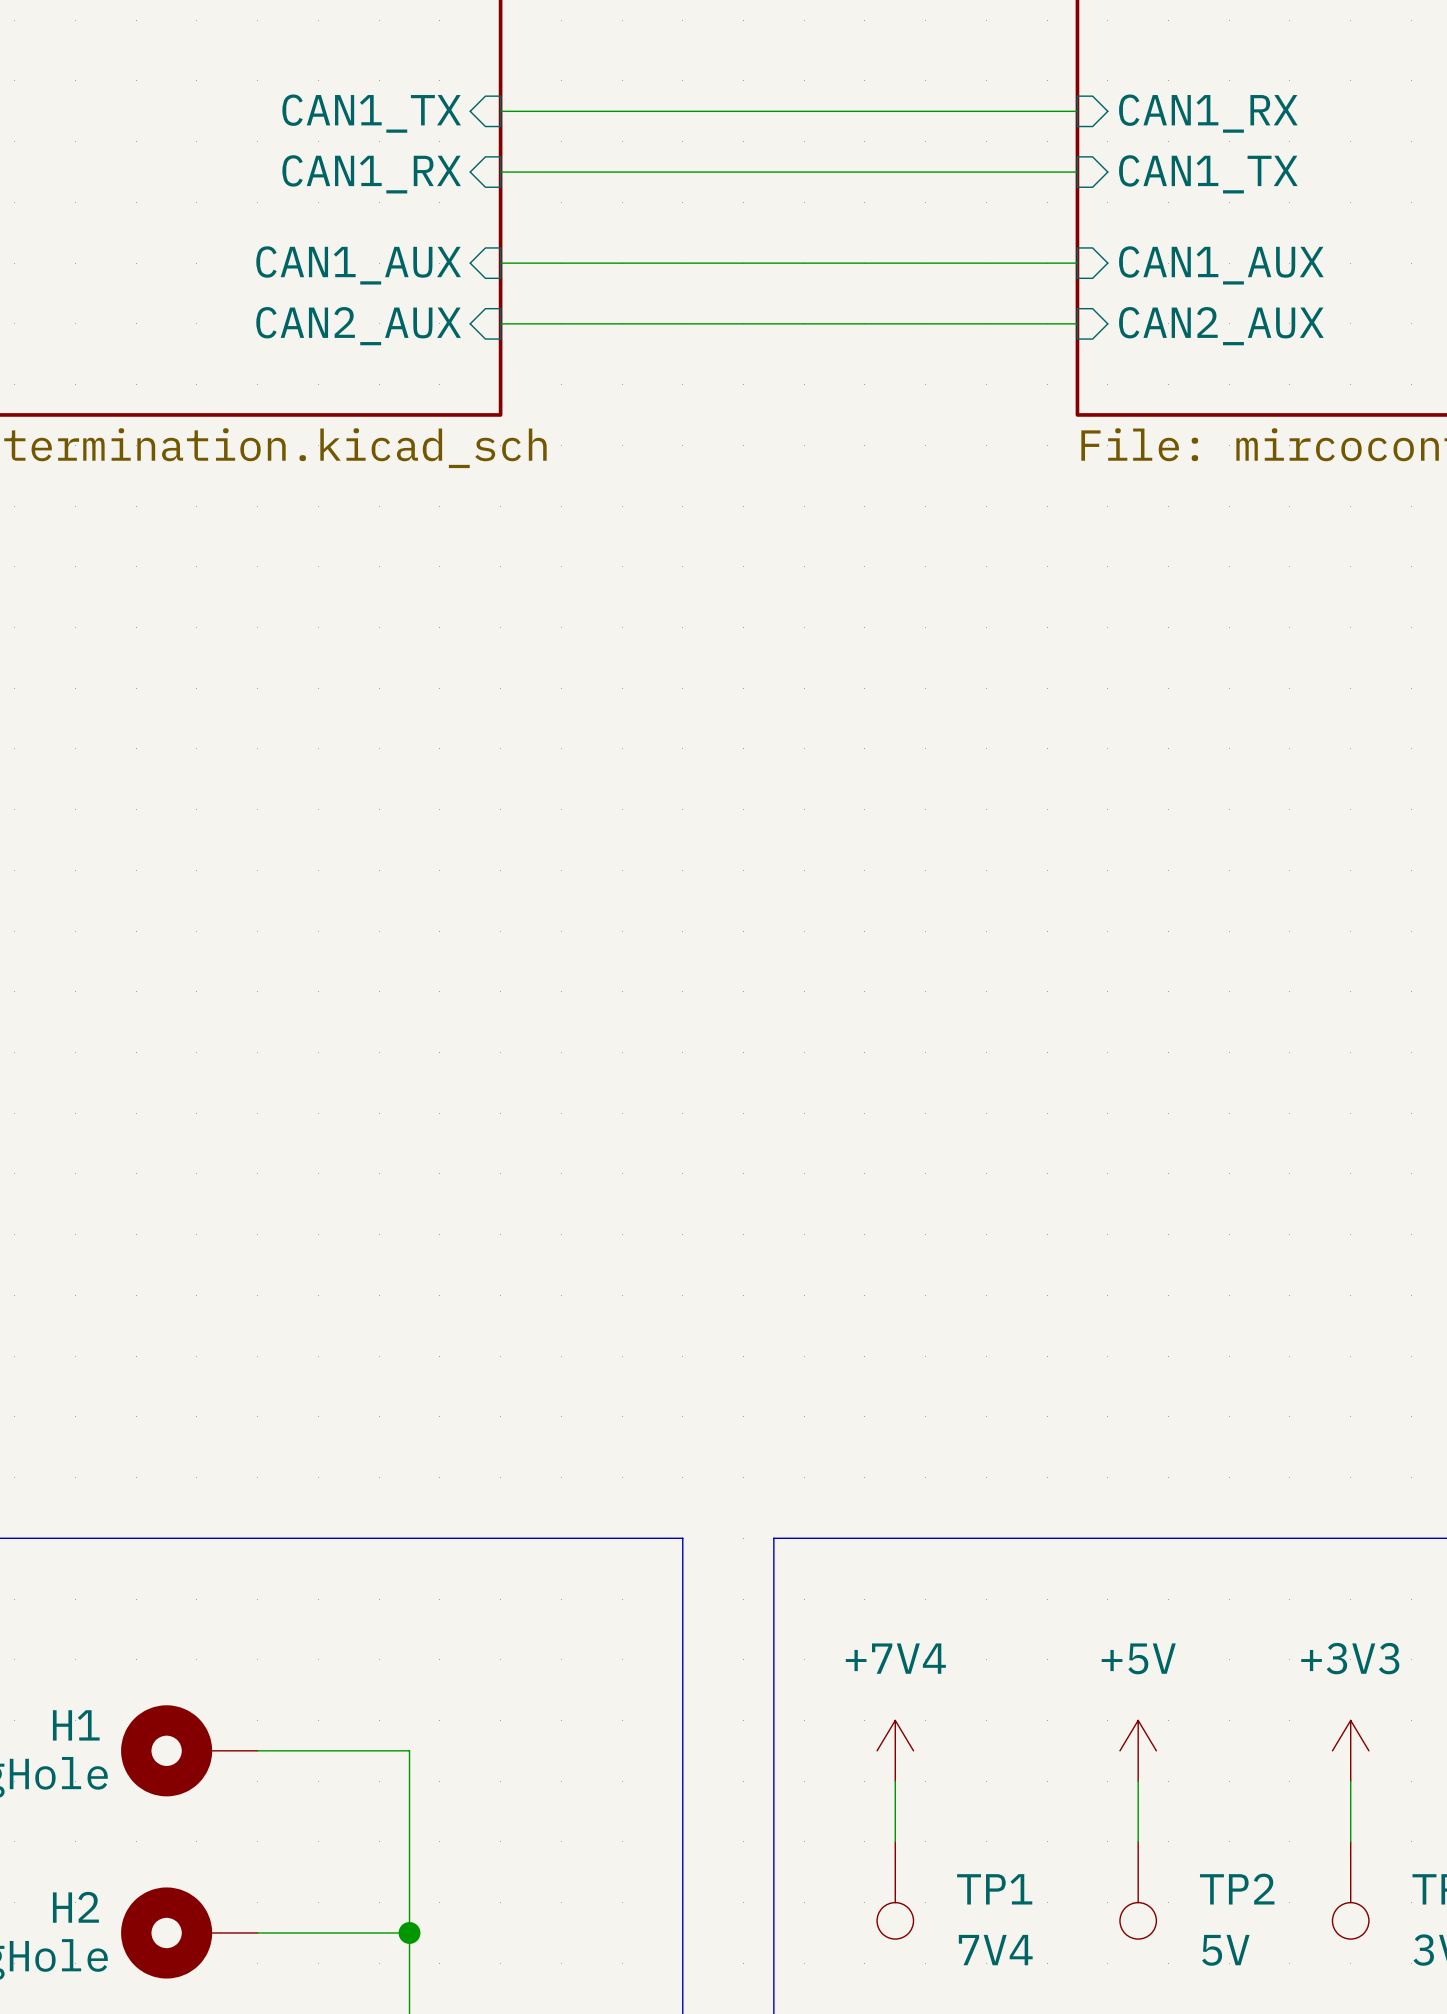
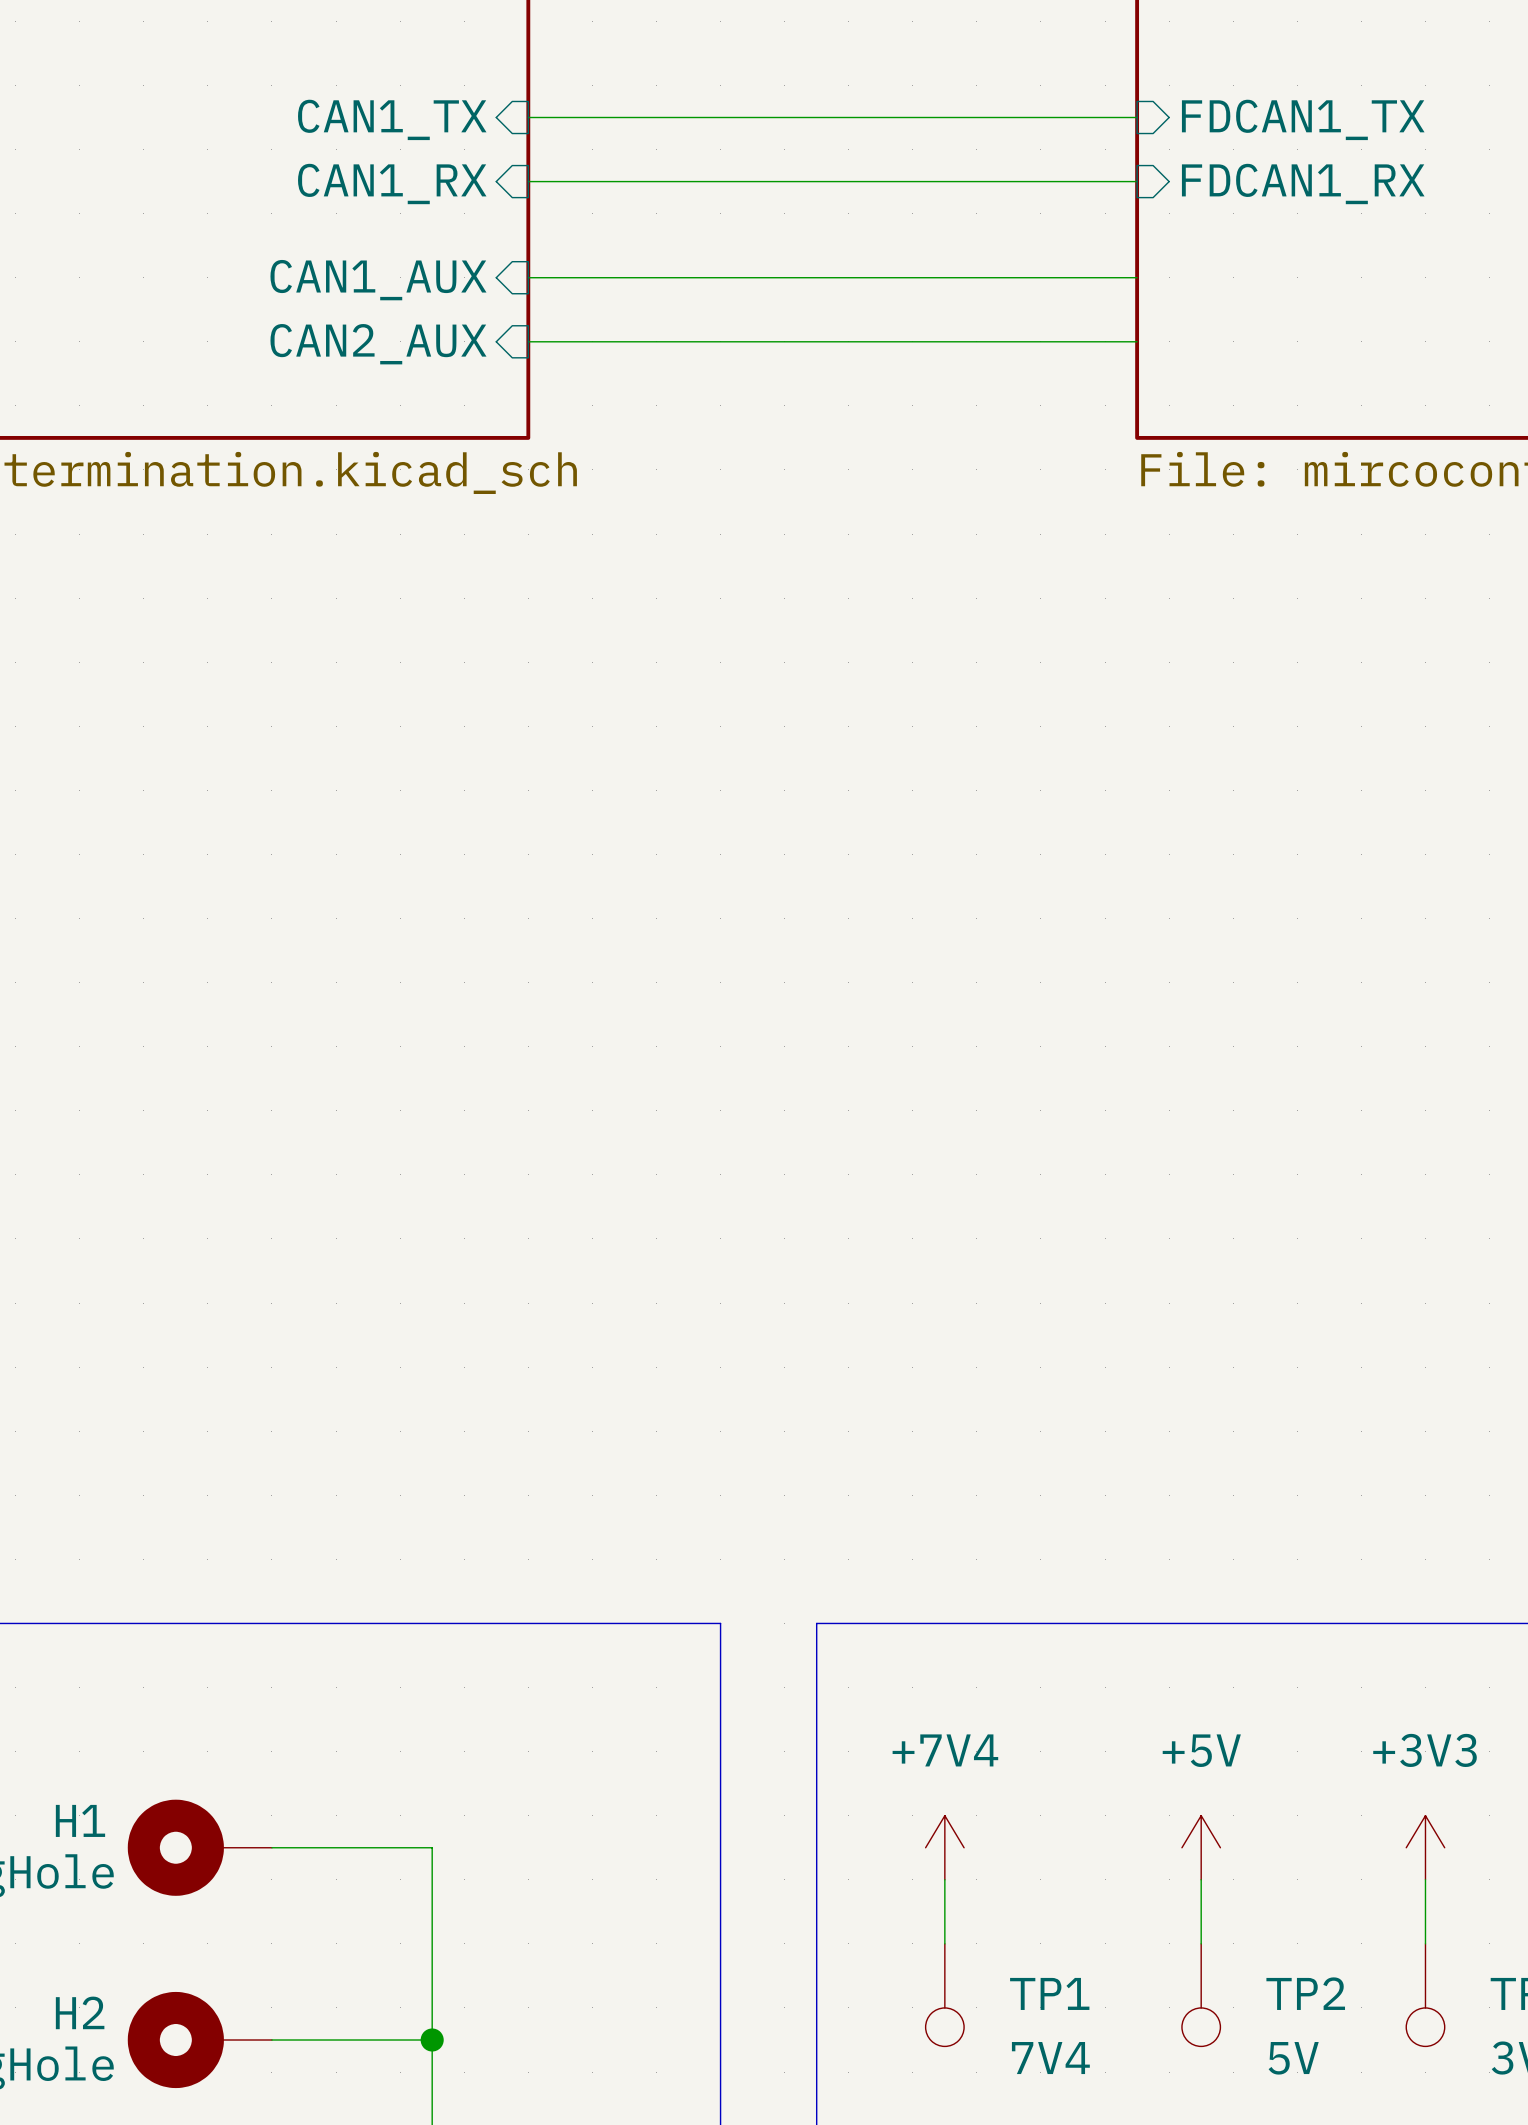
sheet pin: CAN1_RX (1208, 113) -> FDCAN1_TX (1303, 119)
sheet pin: CAN1_TX (1208, 174) -> FDCAN1_RX (1303, 183)
sheet pin: CAN1_AUX (1221, 265) -> none
sheet pin: CAN2_AUX (1221, 326) -> none

